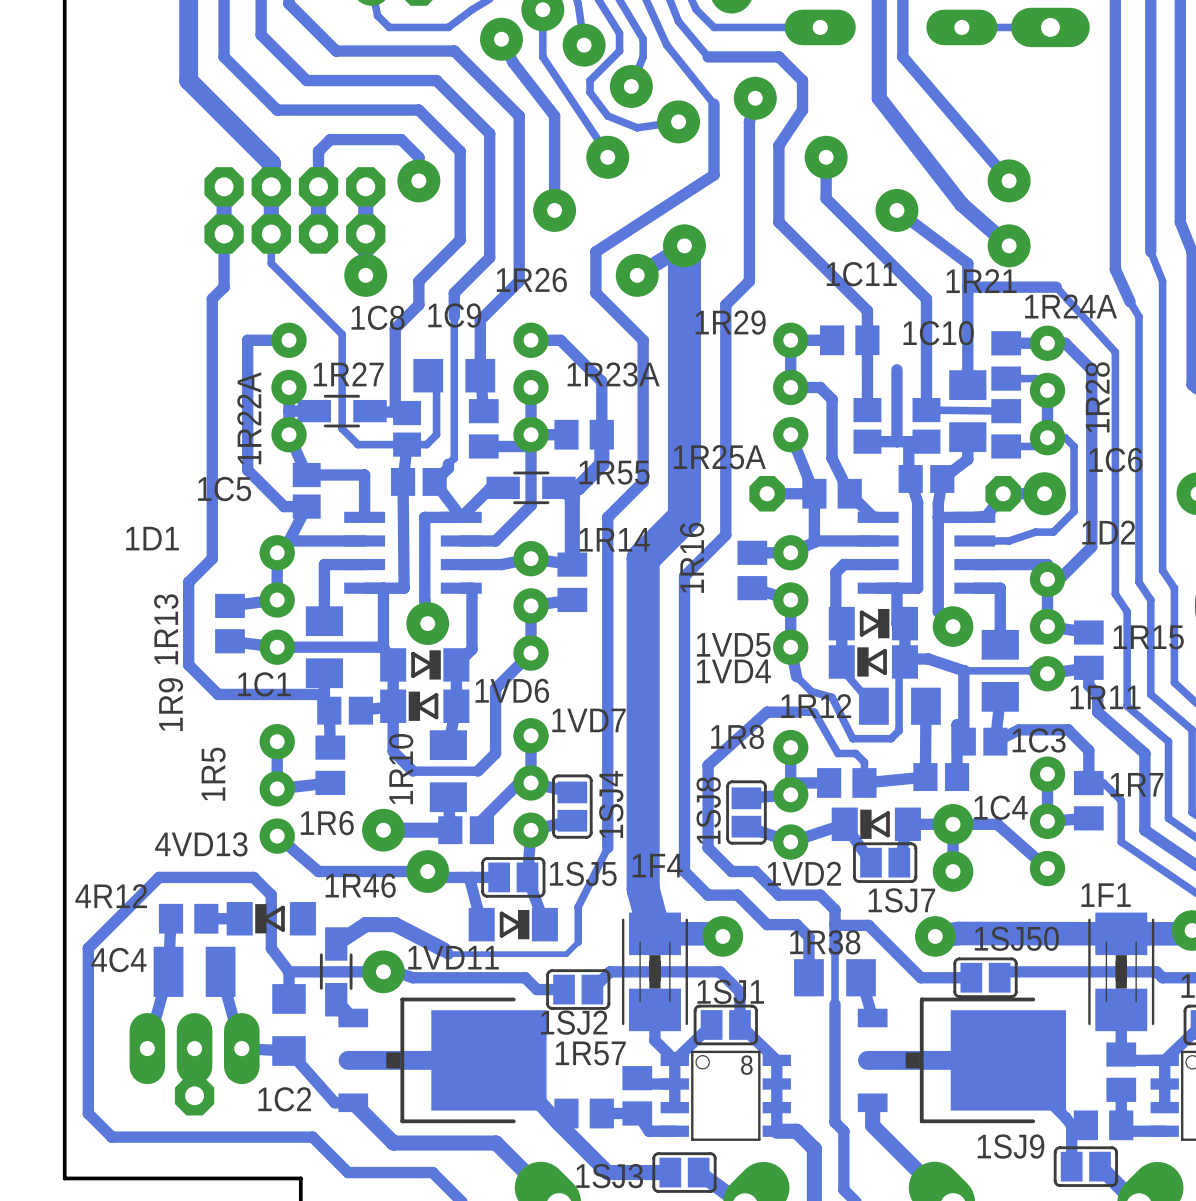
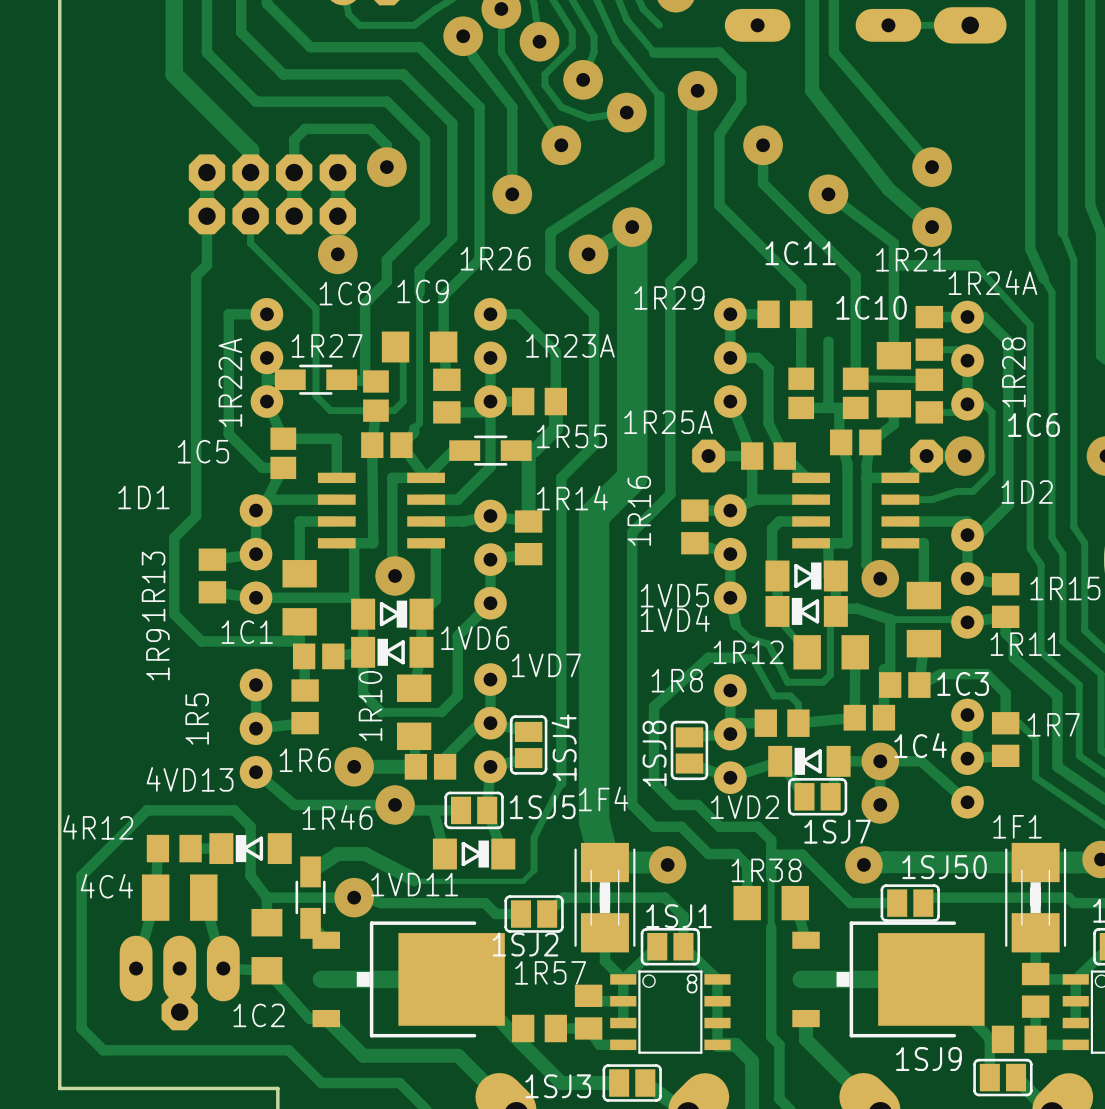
track: (820, 27) (713, 27) -> none

